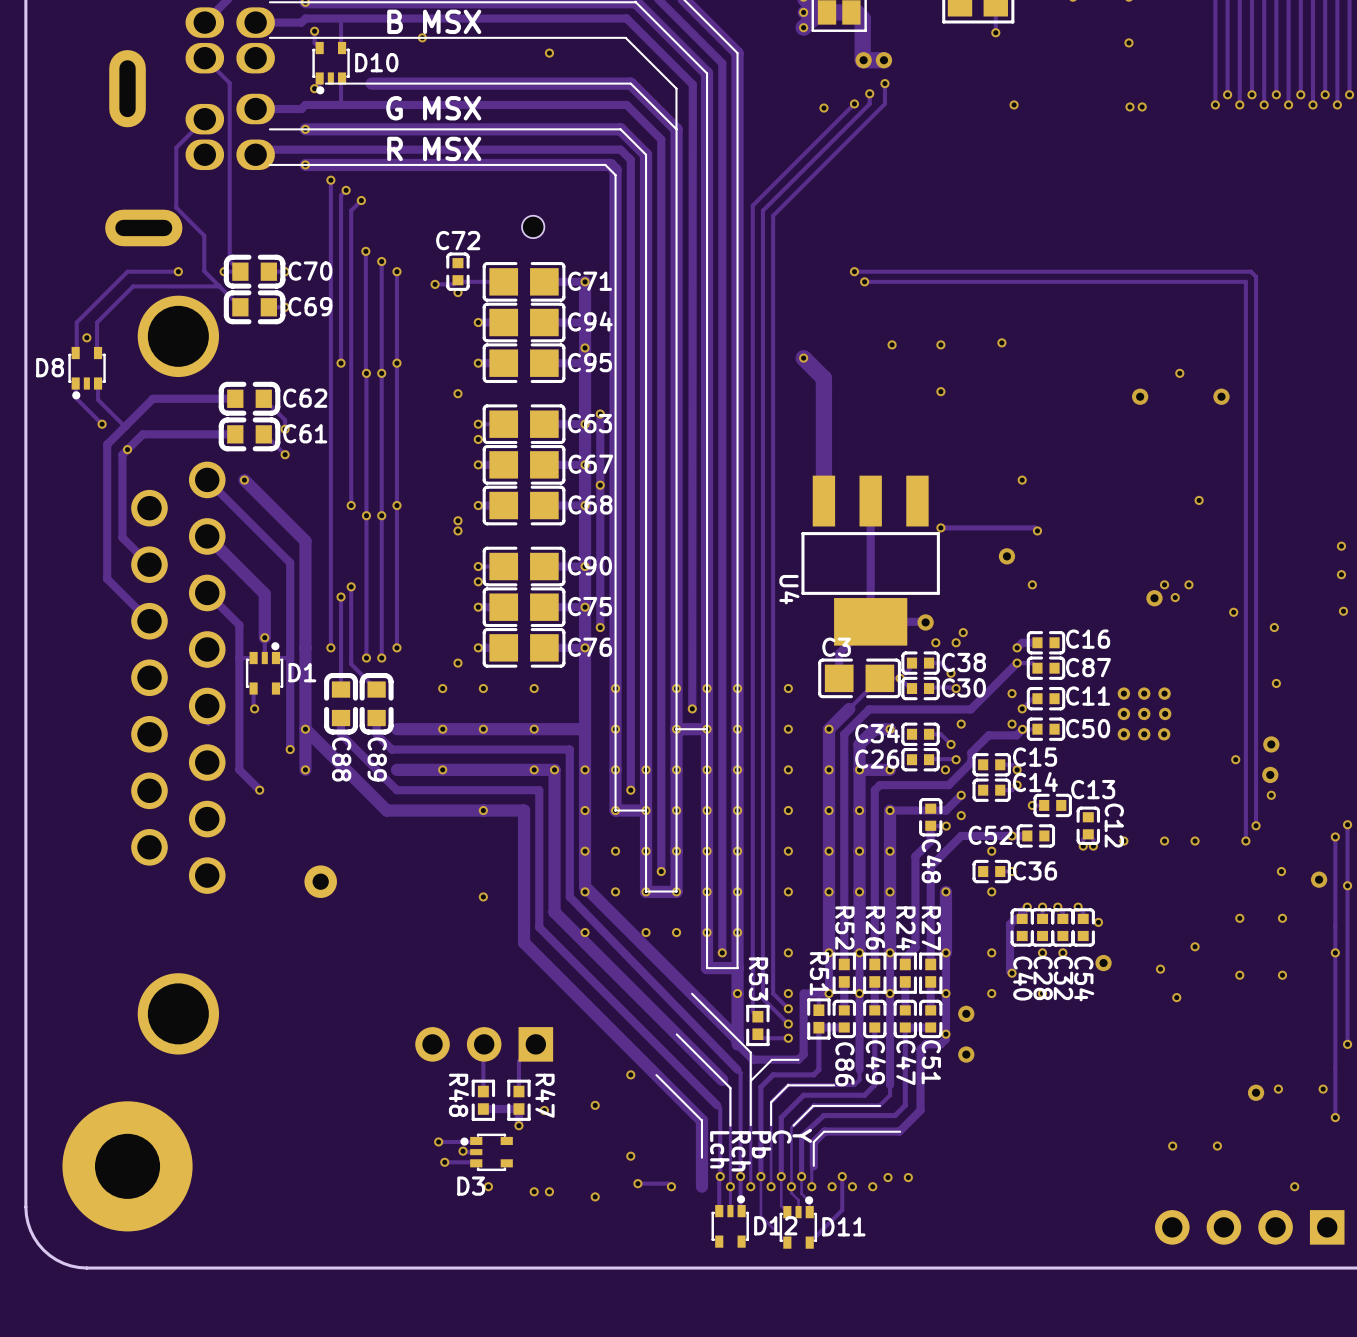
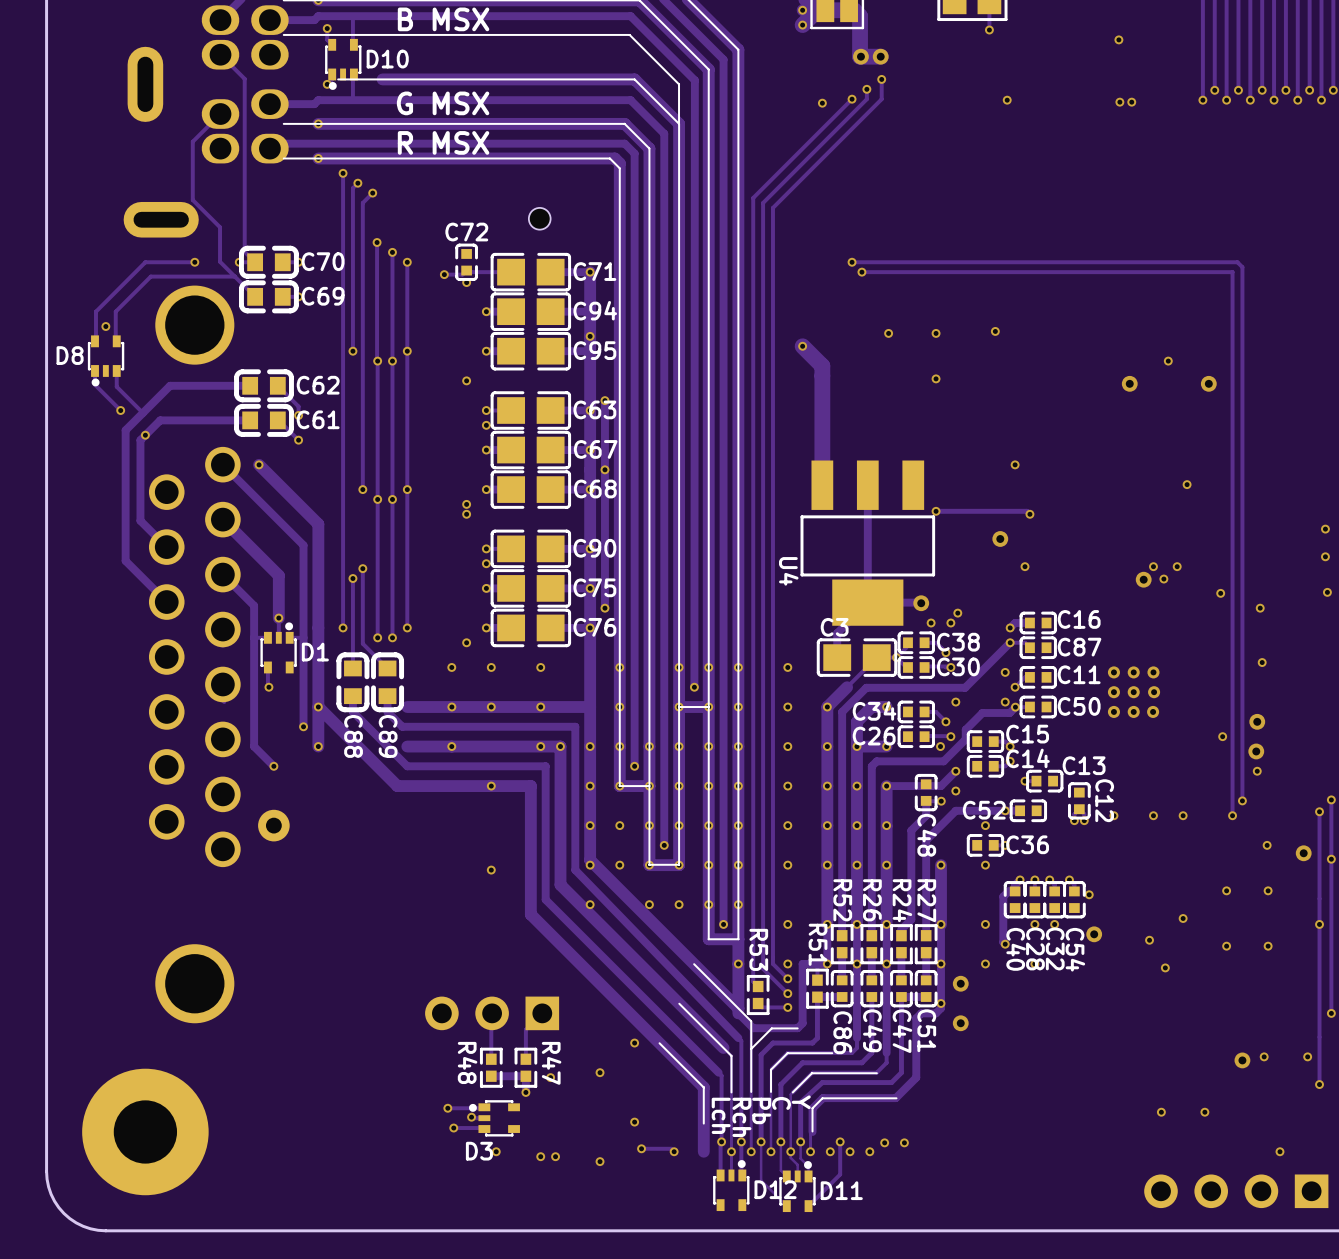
via: (422, 37) -> none
via: (549, 53) -> none
part position: (320, 881) -> (273, 825)

